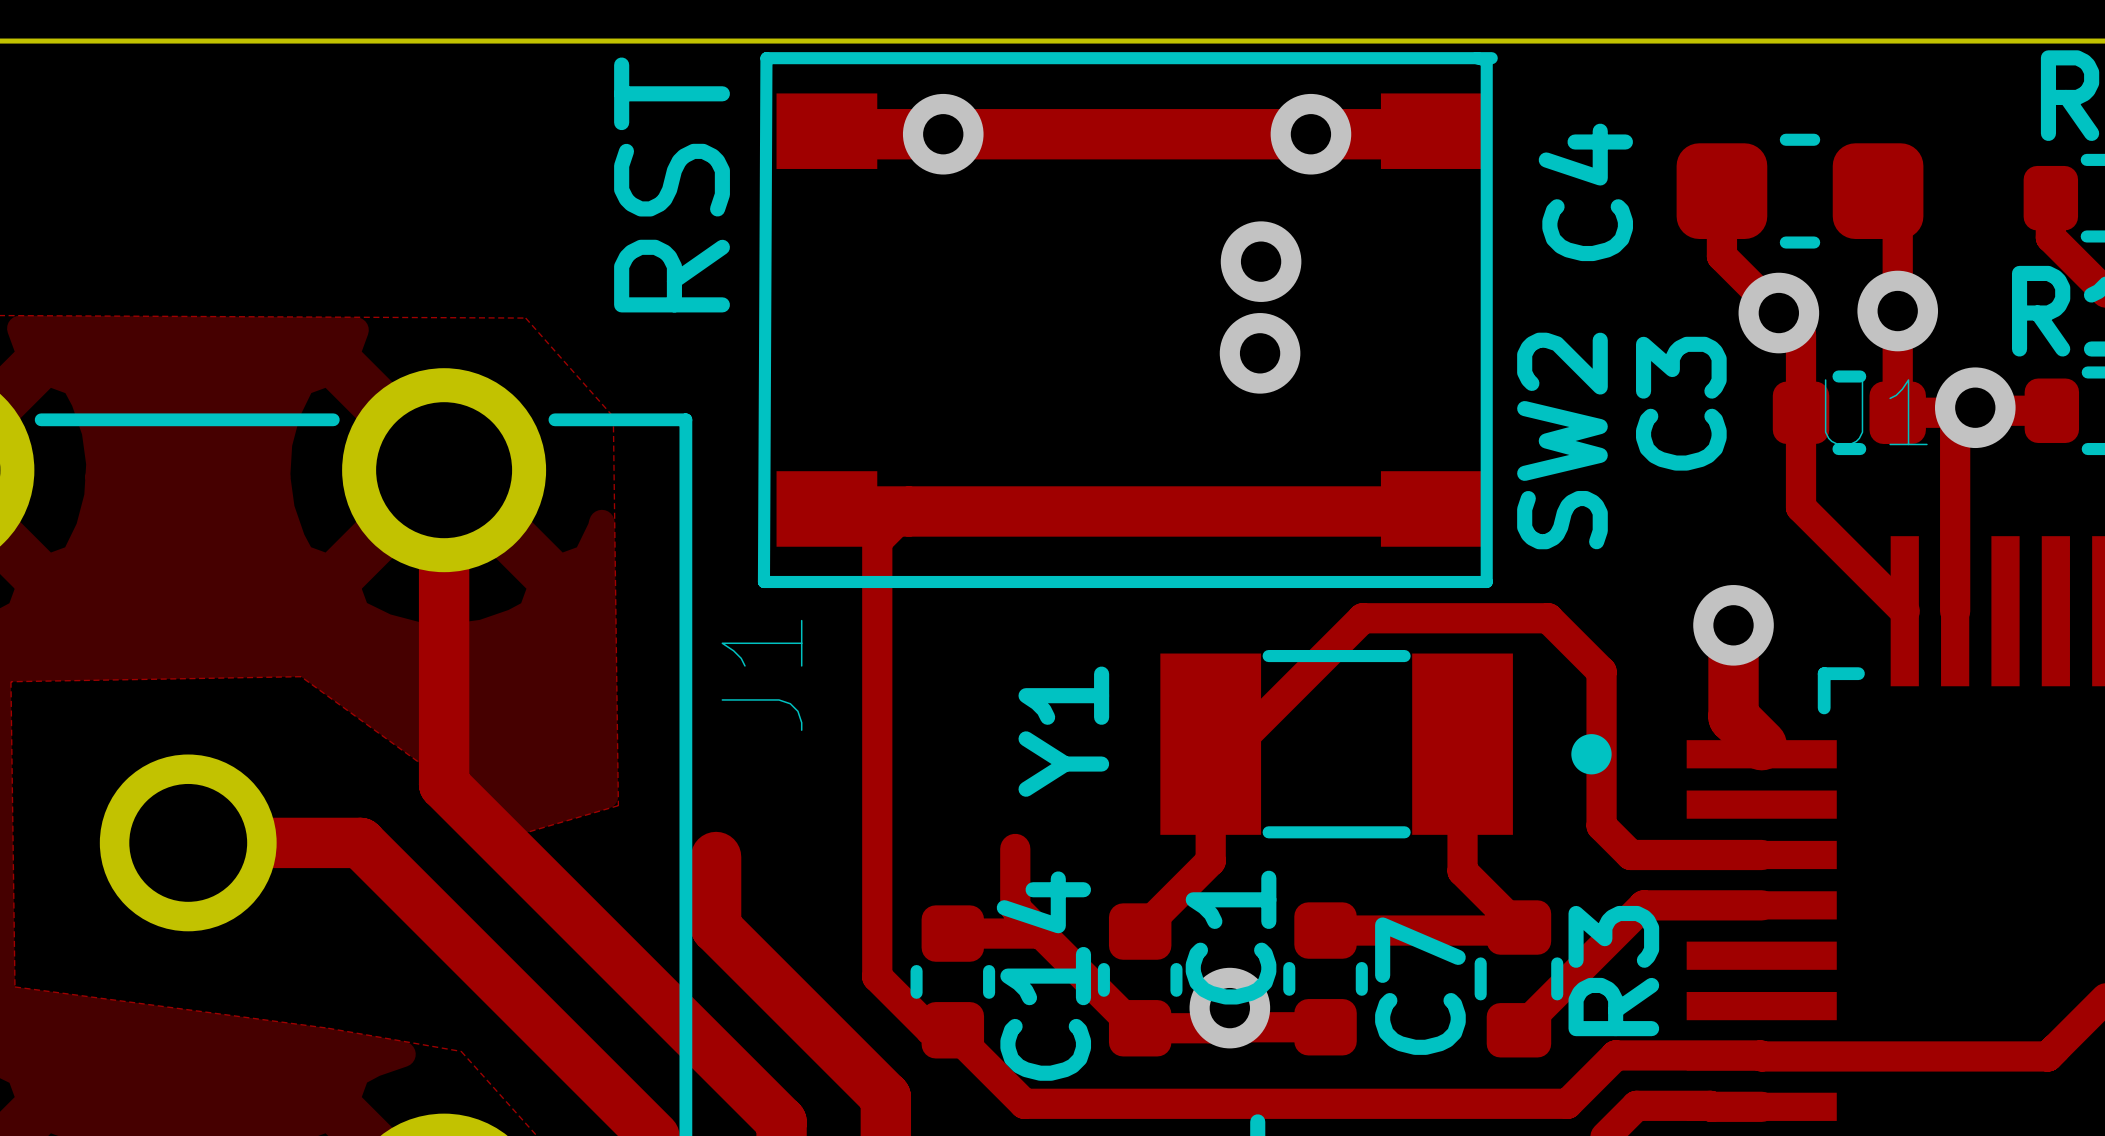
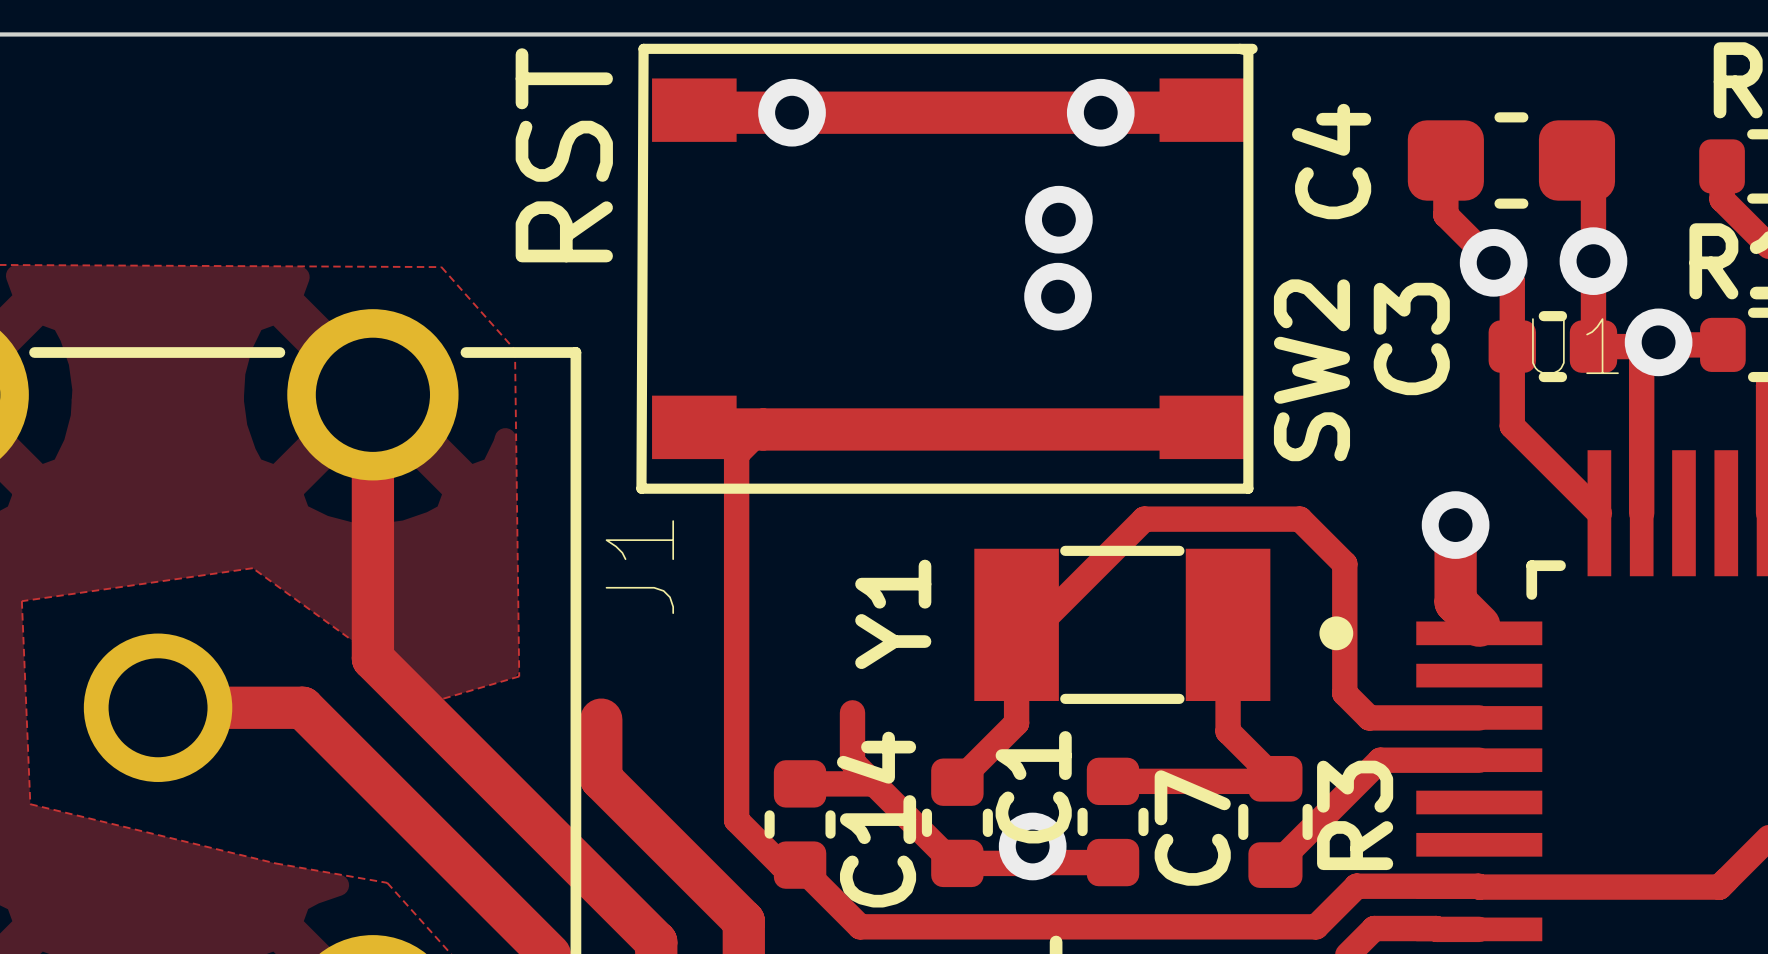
zone outline: (301, 676) (10, 681) (14, 986) (328, 1028) -> (252, 568) (21, 601) (30, 804) (275, 863)

